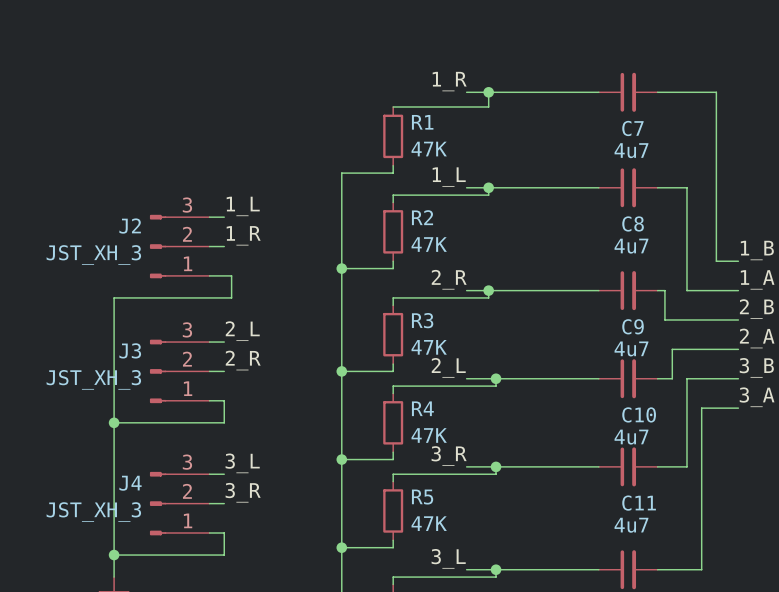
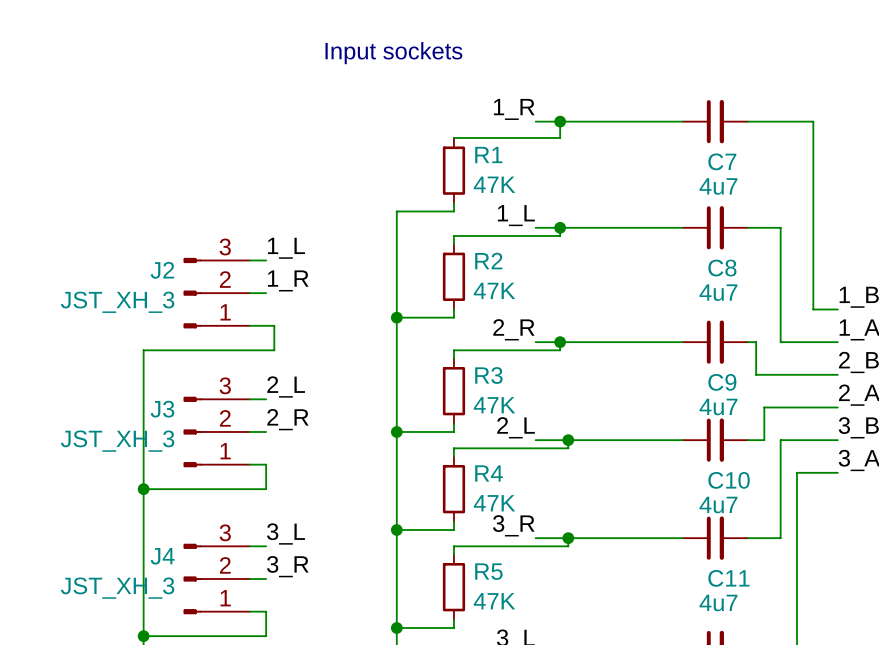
text: none -> Input sockets (393, 53)

